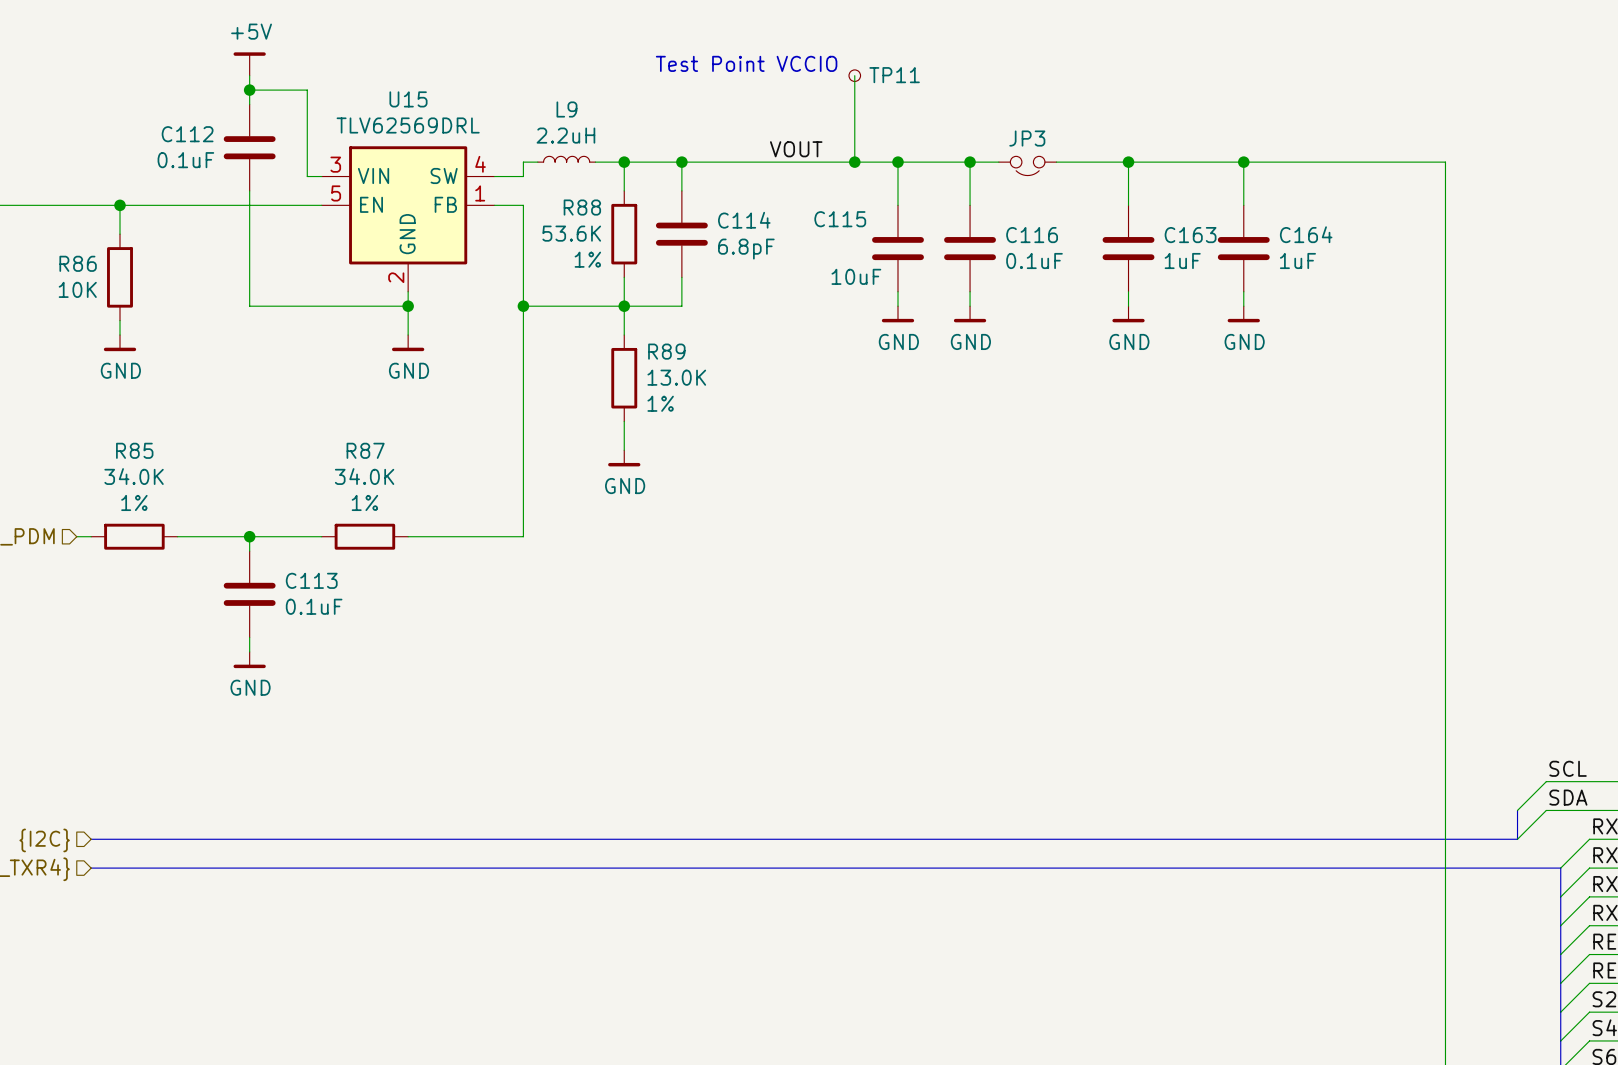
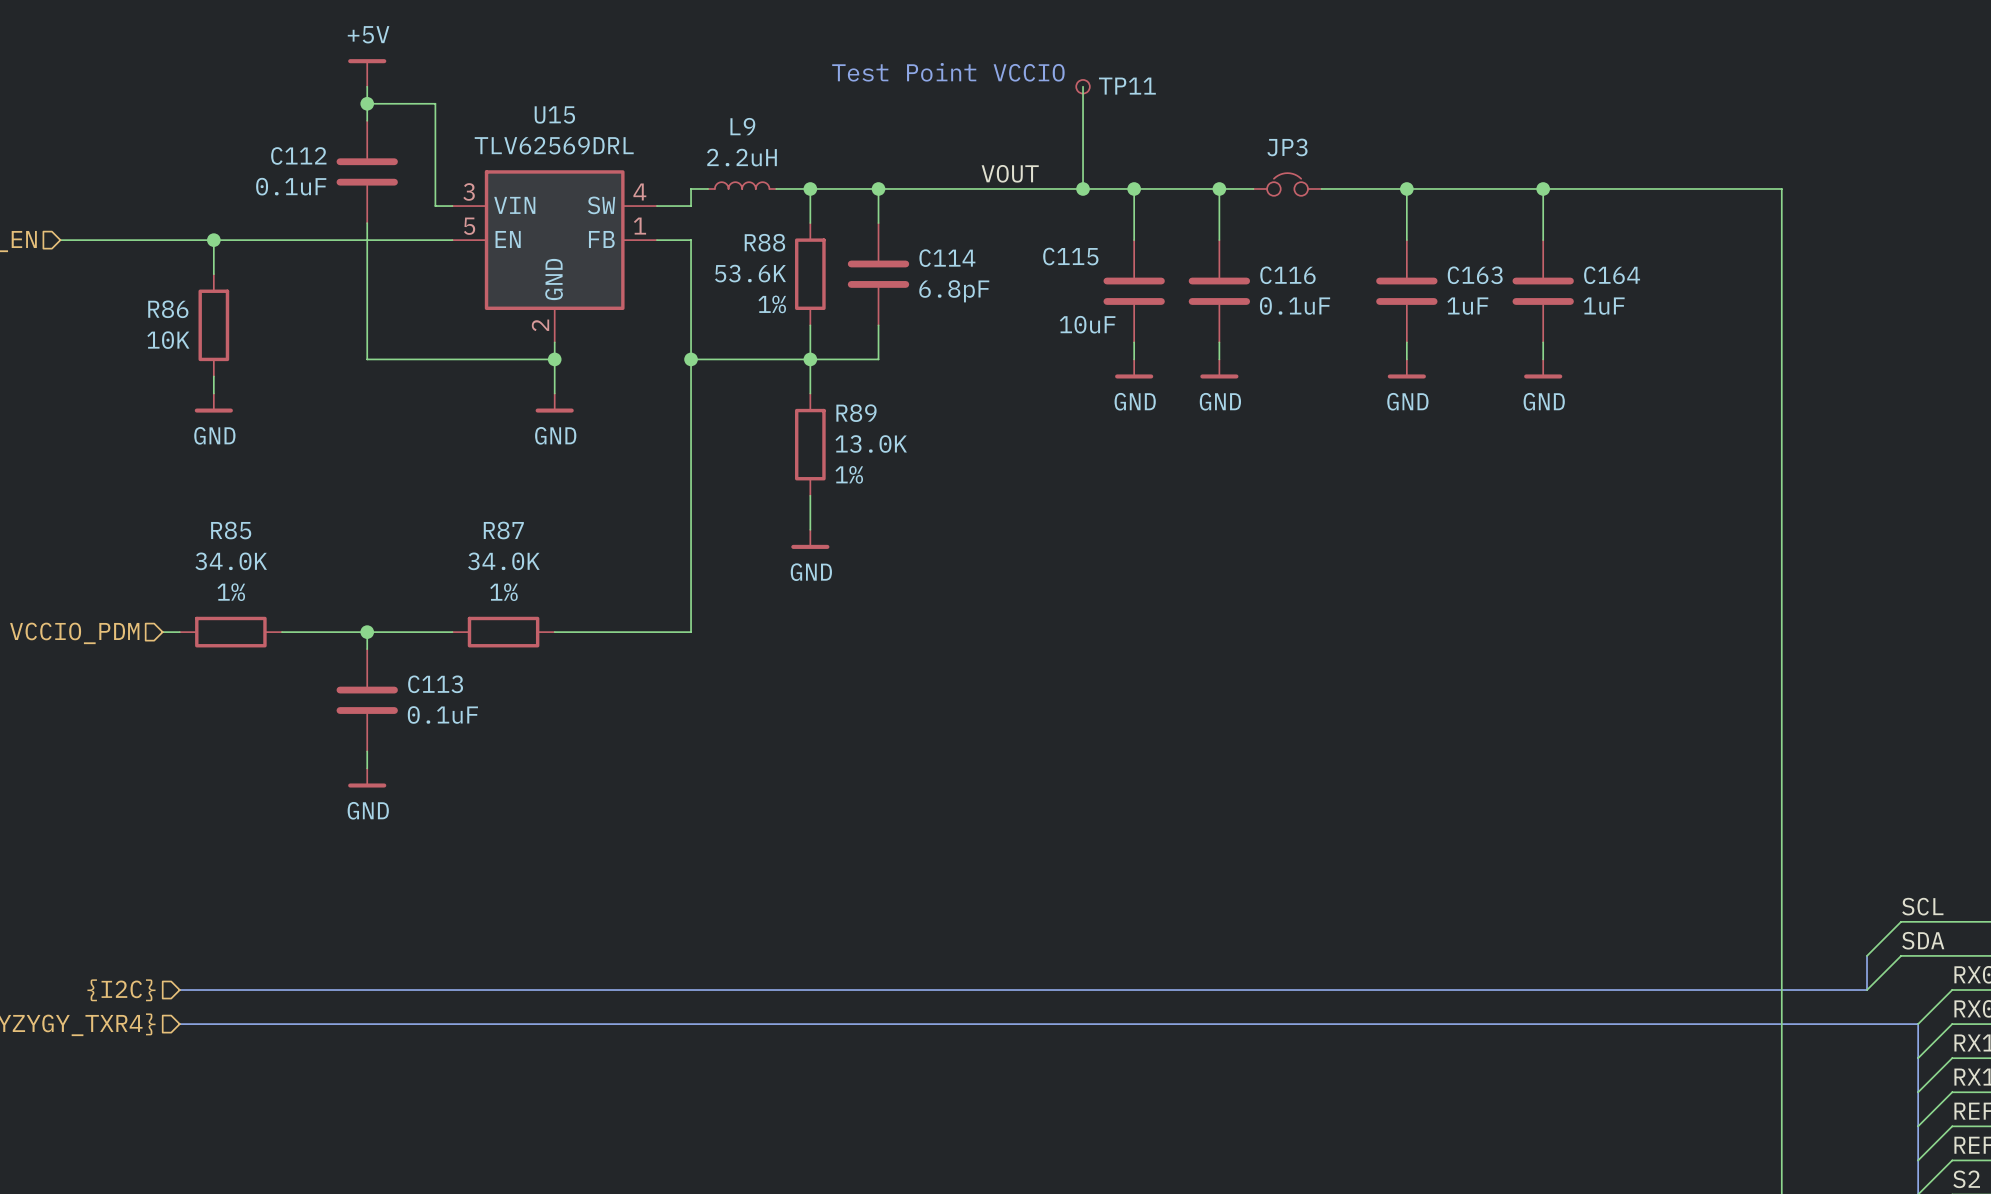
JP3 rotation: 0° (1027, 165) -> 180° (1287, 184)

